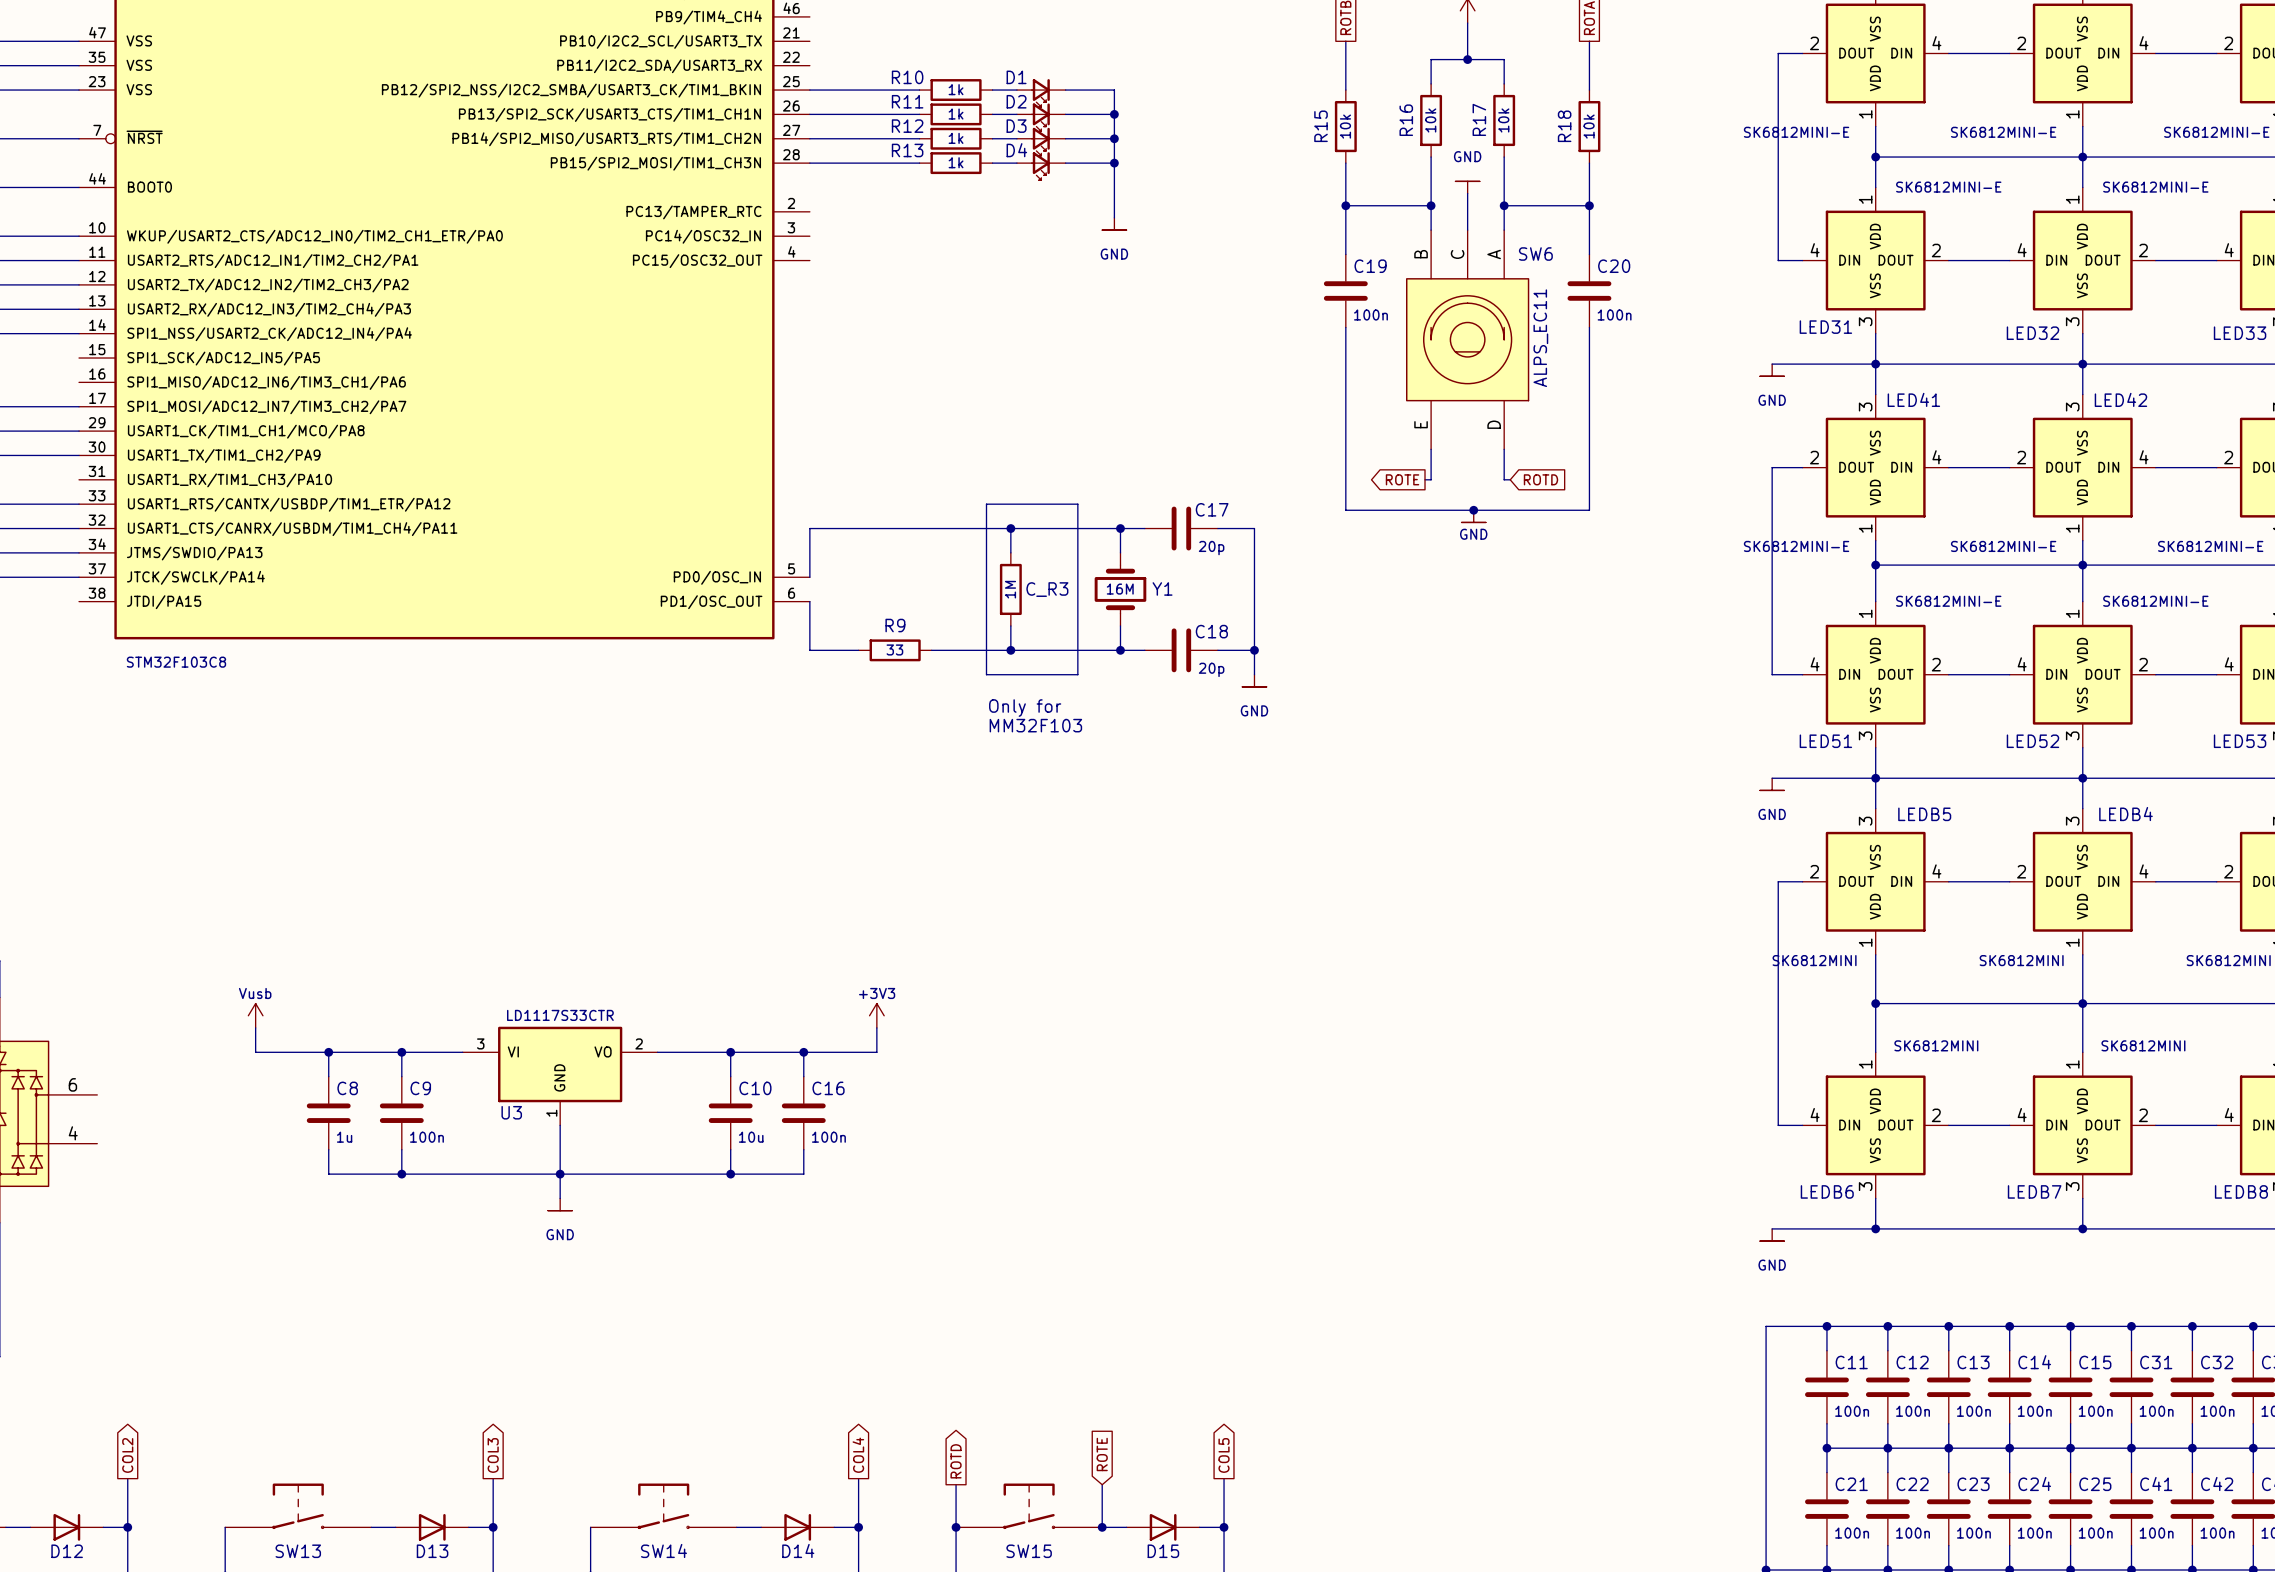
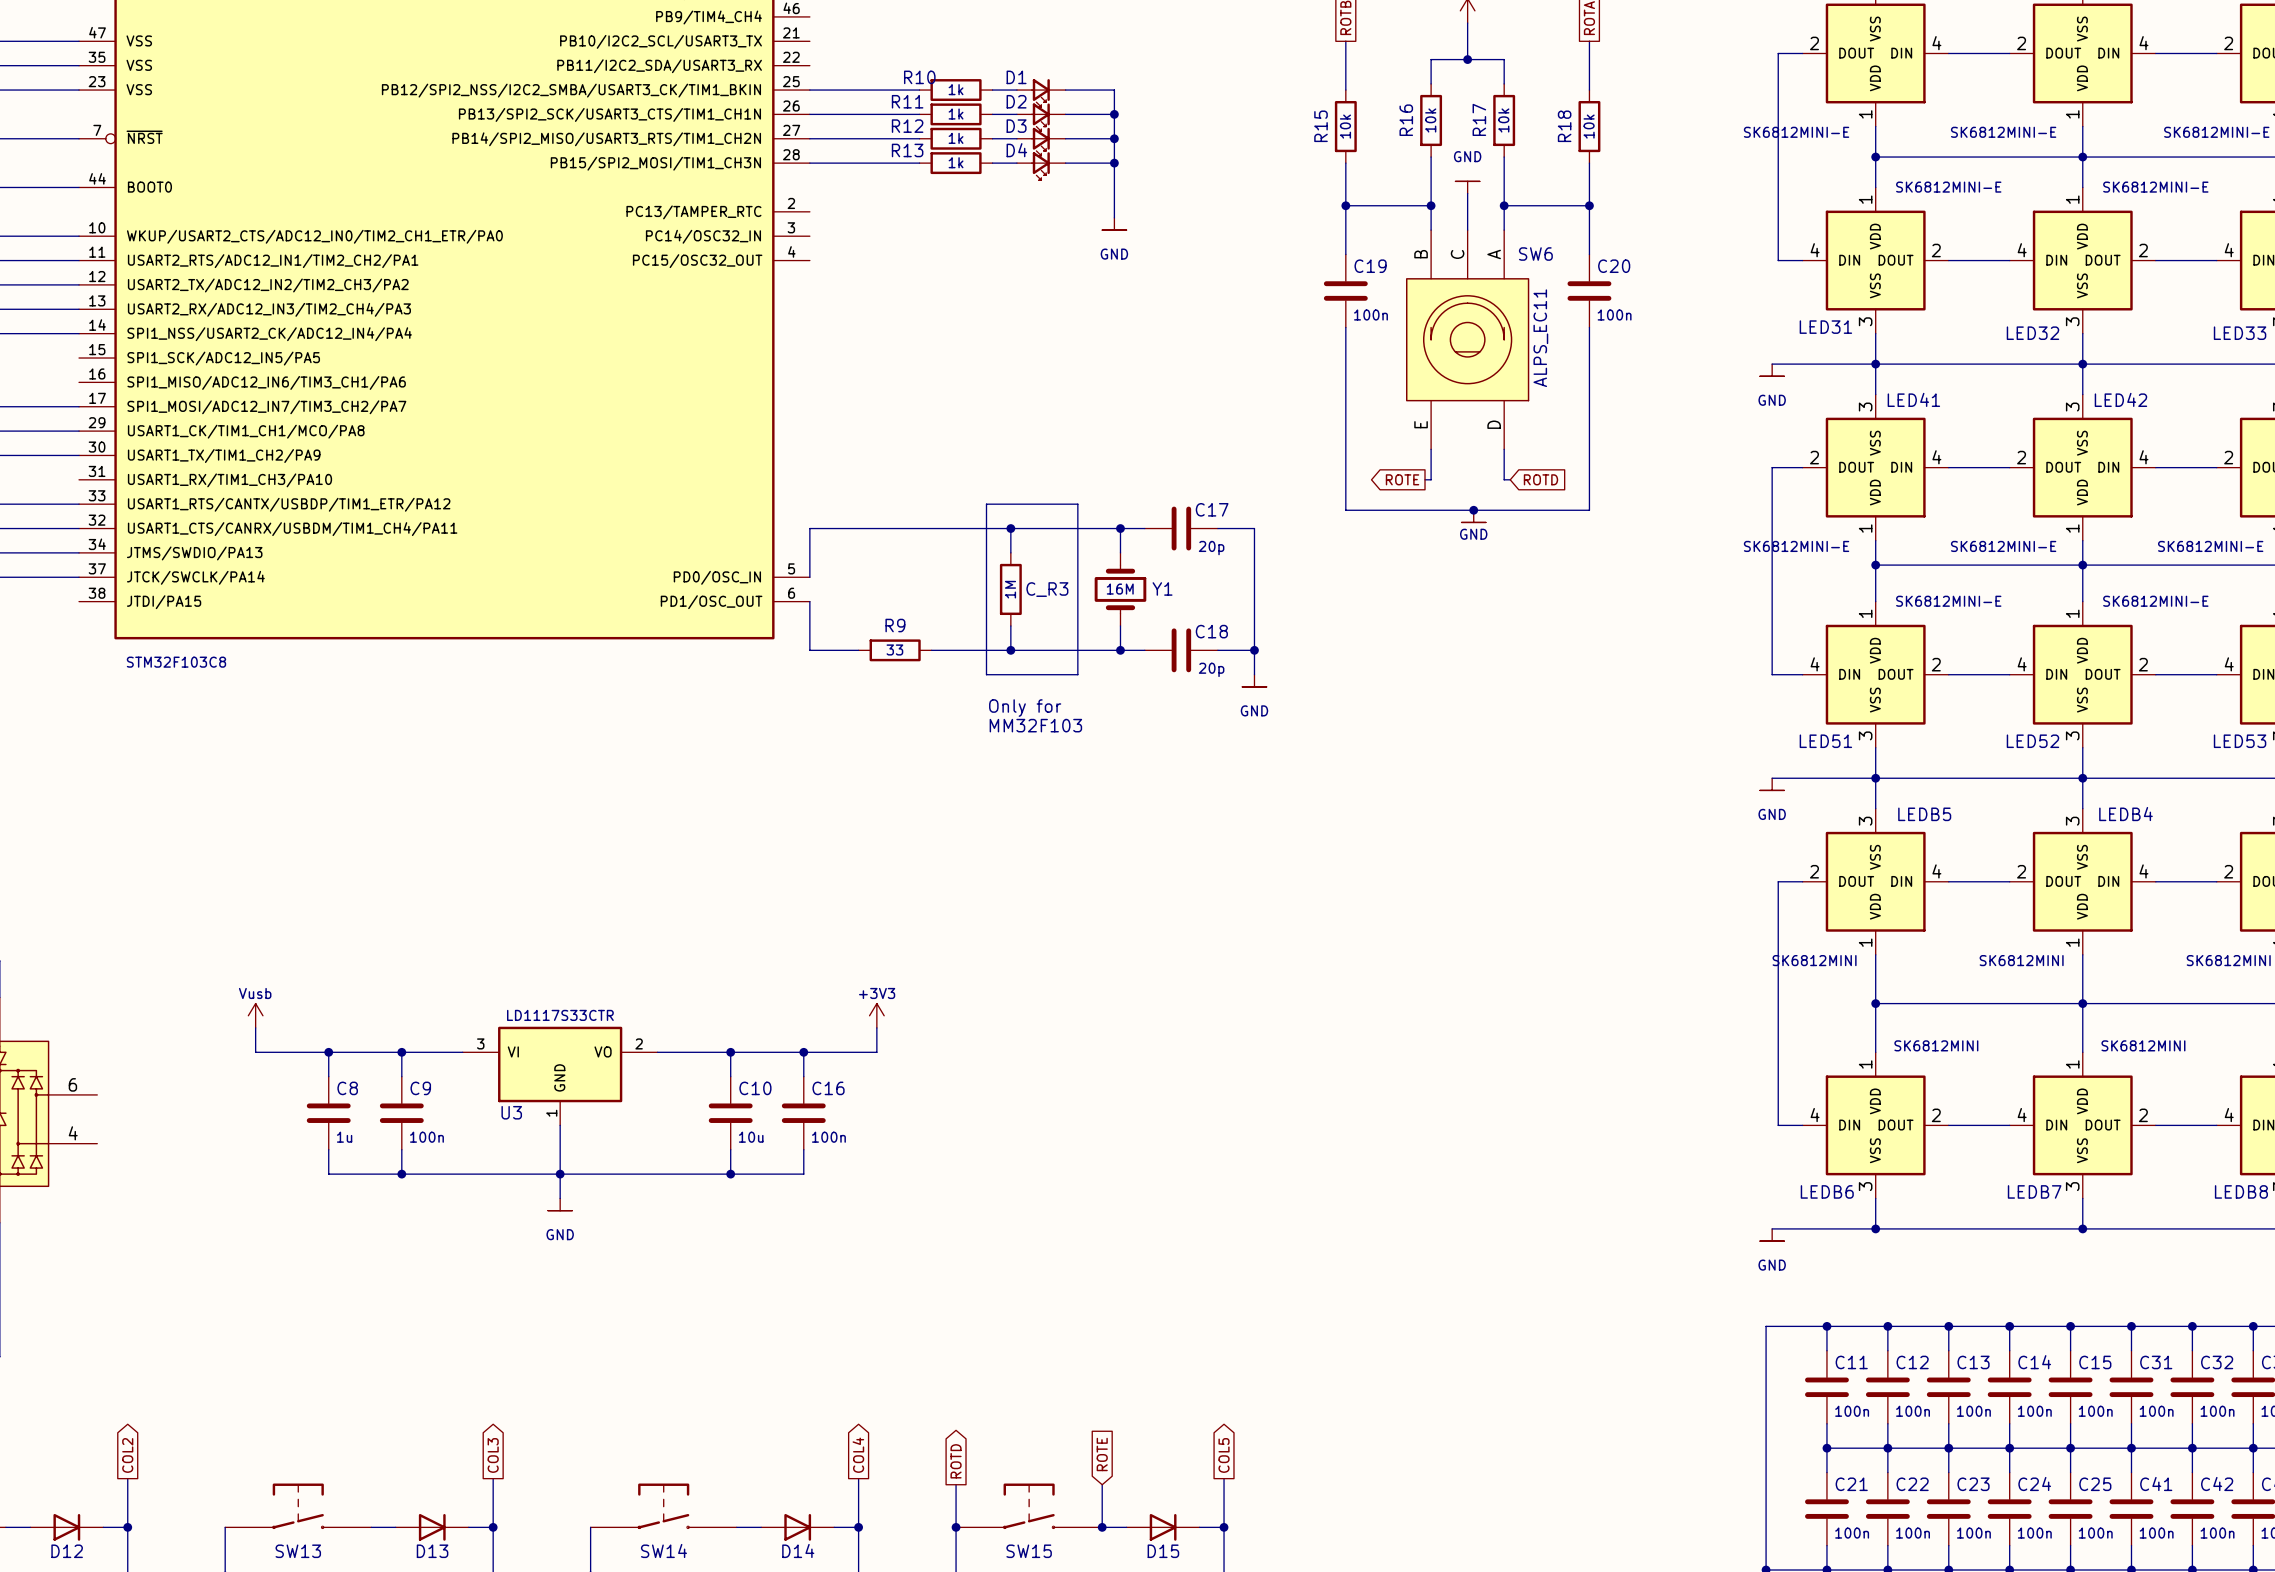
R10 name position: R10 (907, 77) -> R10 (919, 77)

